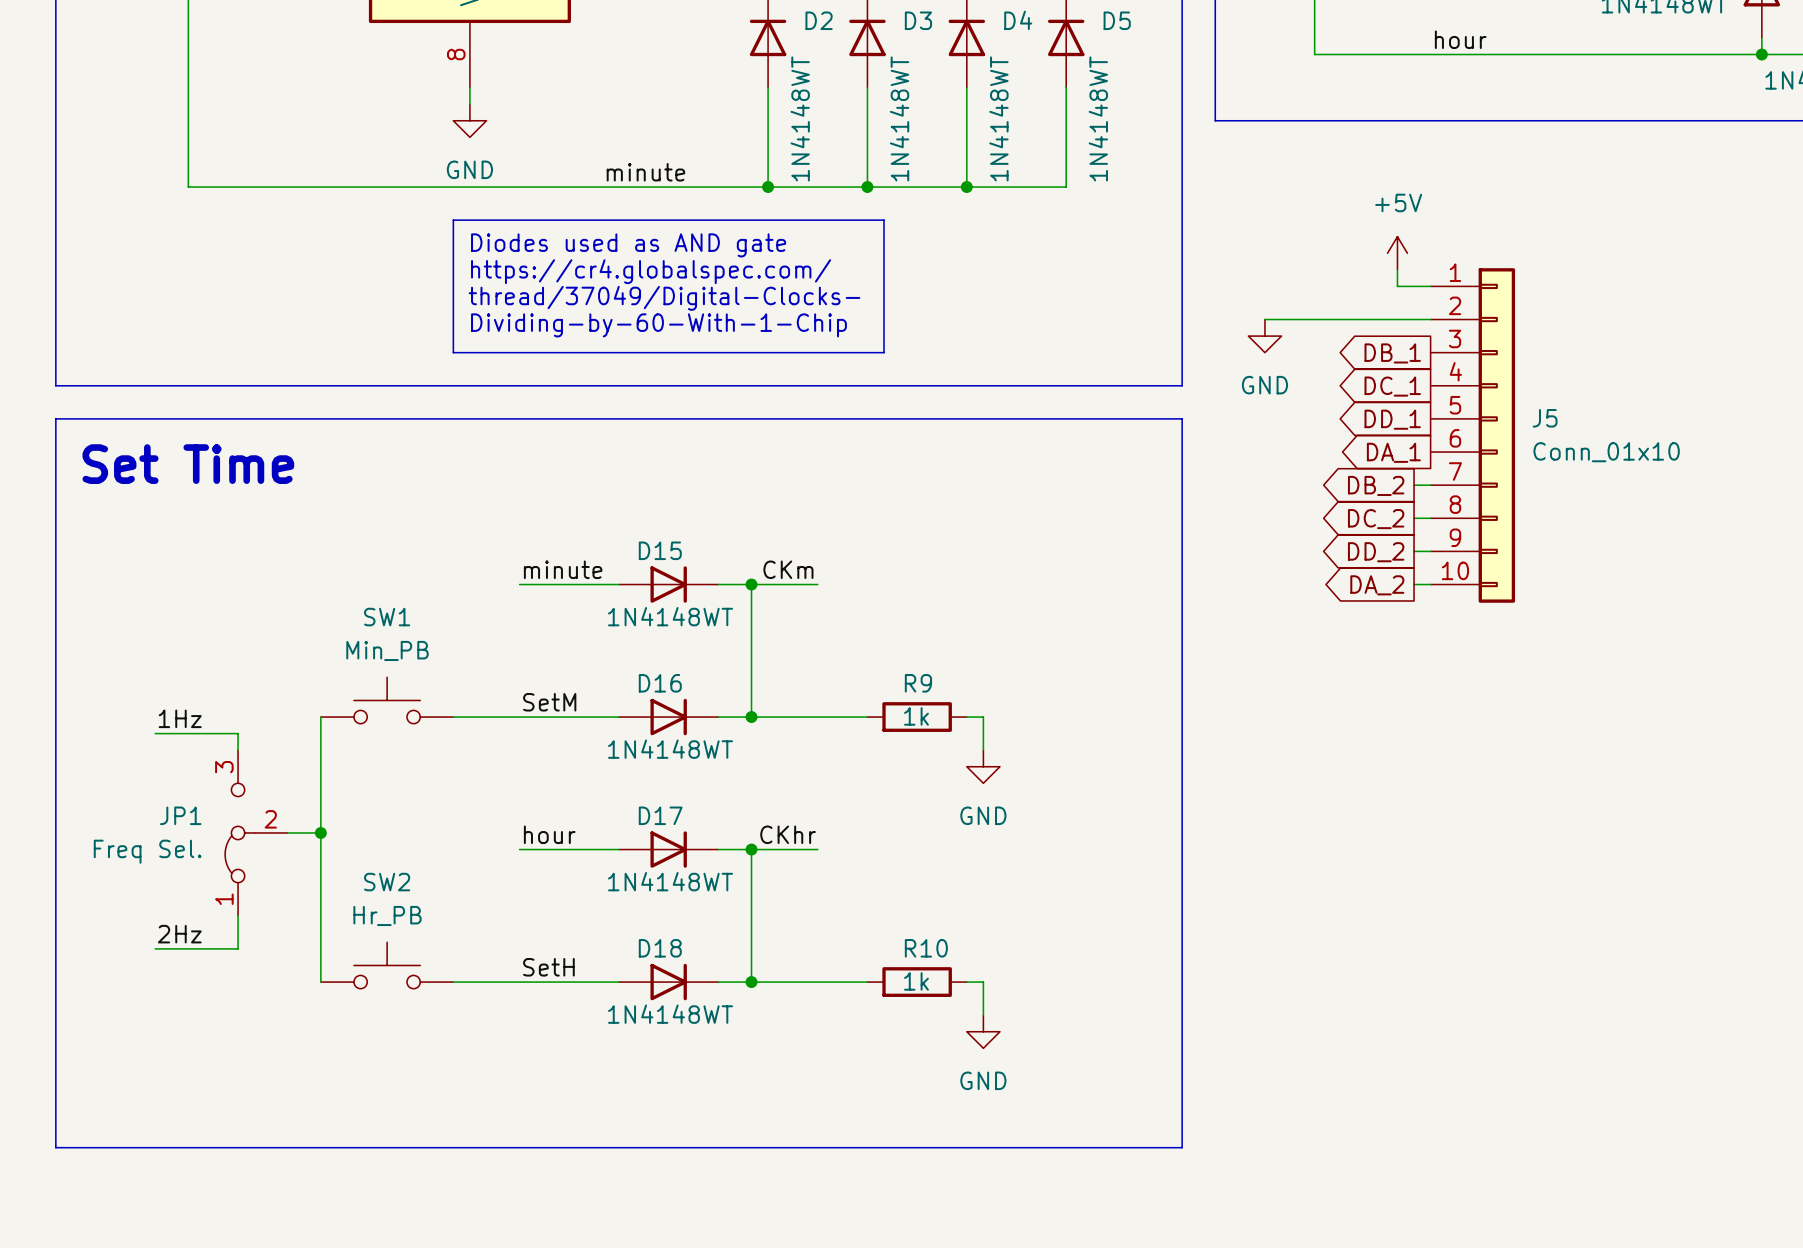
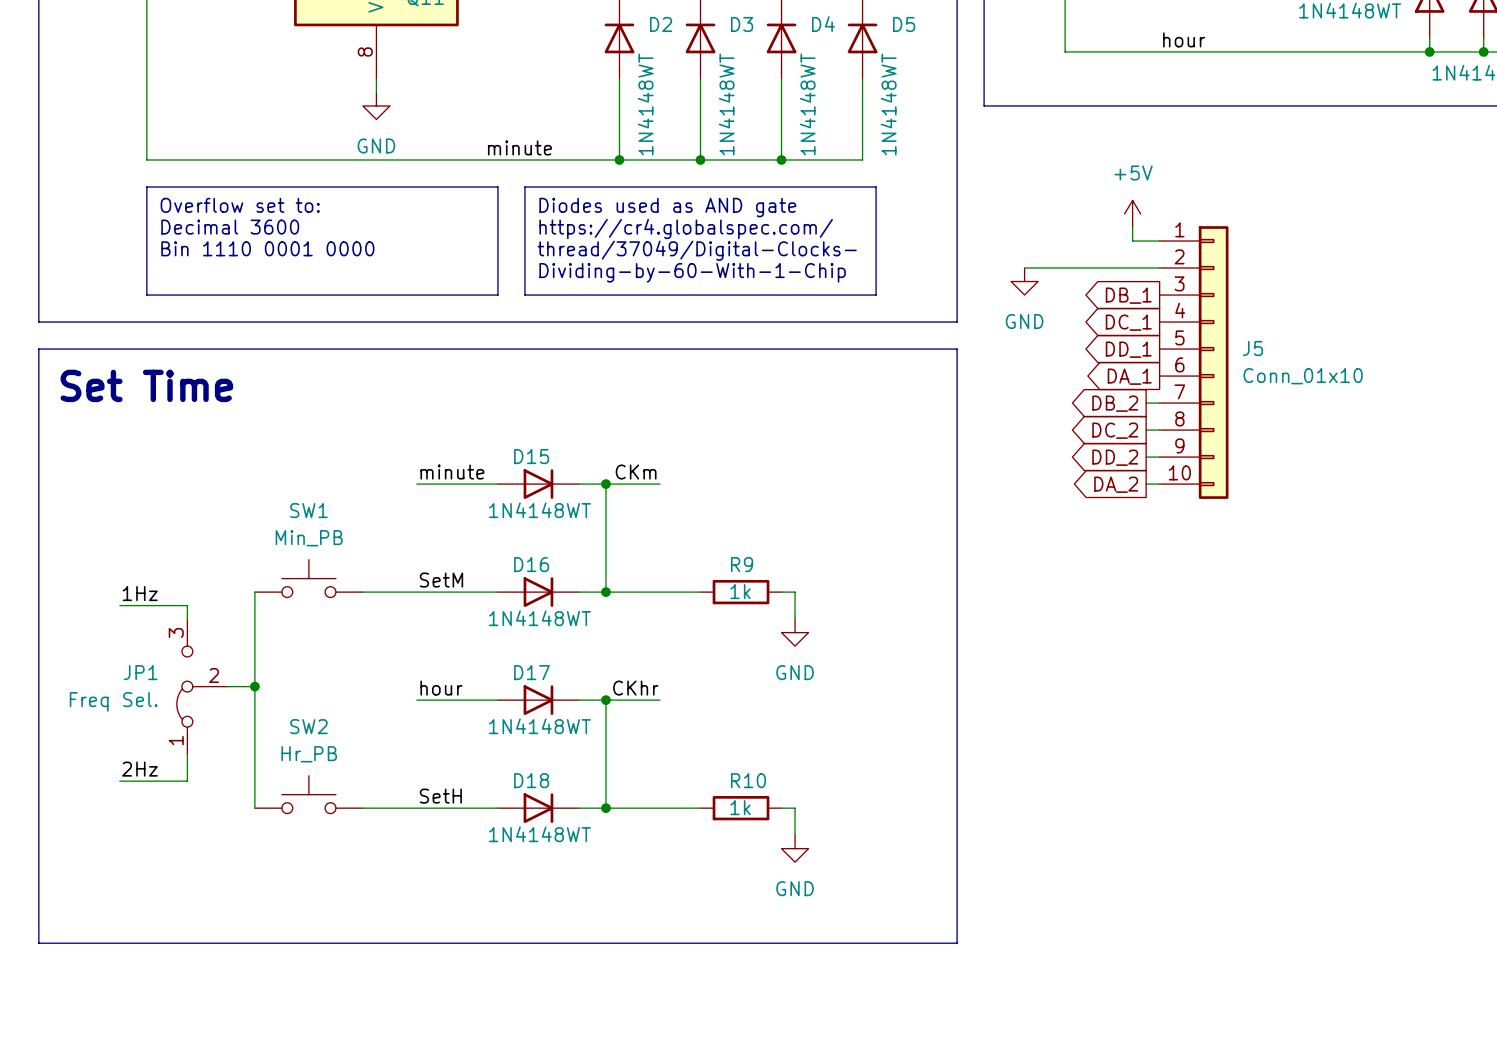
line: (453, 220) (453, 352) -> (362, 187) (146, 187) (146, 295) (362, 295)
line: (618, 220) (652, 220) -> (497, 187) (497, 295)
line: (884, 220) (884, 352) -> (714, 187) (876, 187) (876, 295) (714, 295)
text: none -> Overflow set to: (240, 205)
text position: Diodes used as AND gate (628, 245) -> Diodes used as AND gate (667, 207)
text: none -> Decimal 3600 (230, 227)
text position: https://cr4.globalspec.com/ (651, 271) -> https://cr4.globalspec.com/ (686, 229)
text: none -> Bin 1110 0001 0000 (267, 248)
text position: thread/37049/Digital-Clocks- (664, 298) -> thread/37049/Digital-Clocks- (697, 250)
text position: Dividing-by-60-With-1-Chip (658, 325) -> Dividing-by-60-With-1-Chip (692, 272)
line: (618, 352) (652, 352) -> (524, 187) (524, 295)

